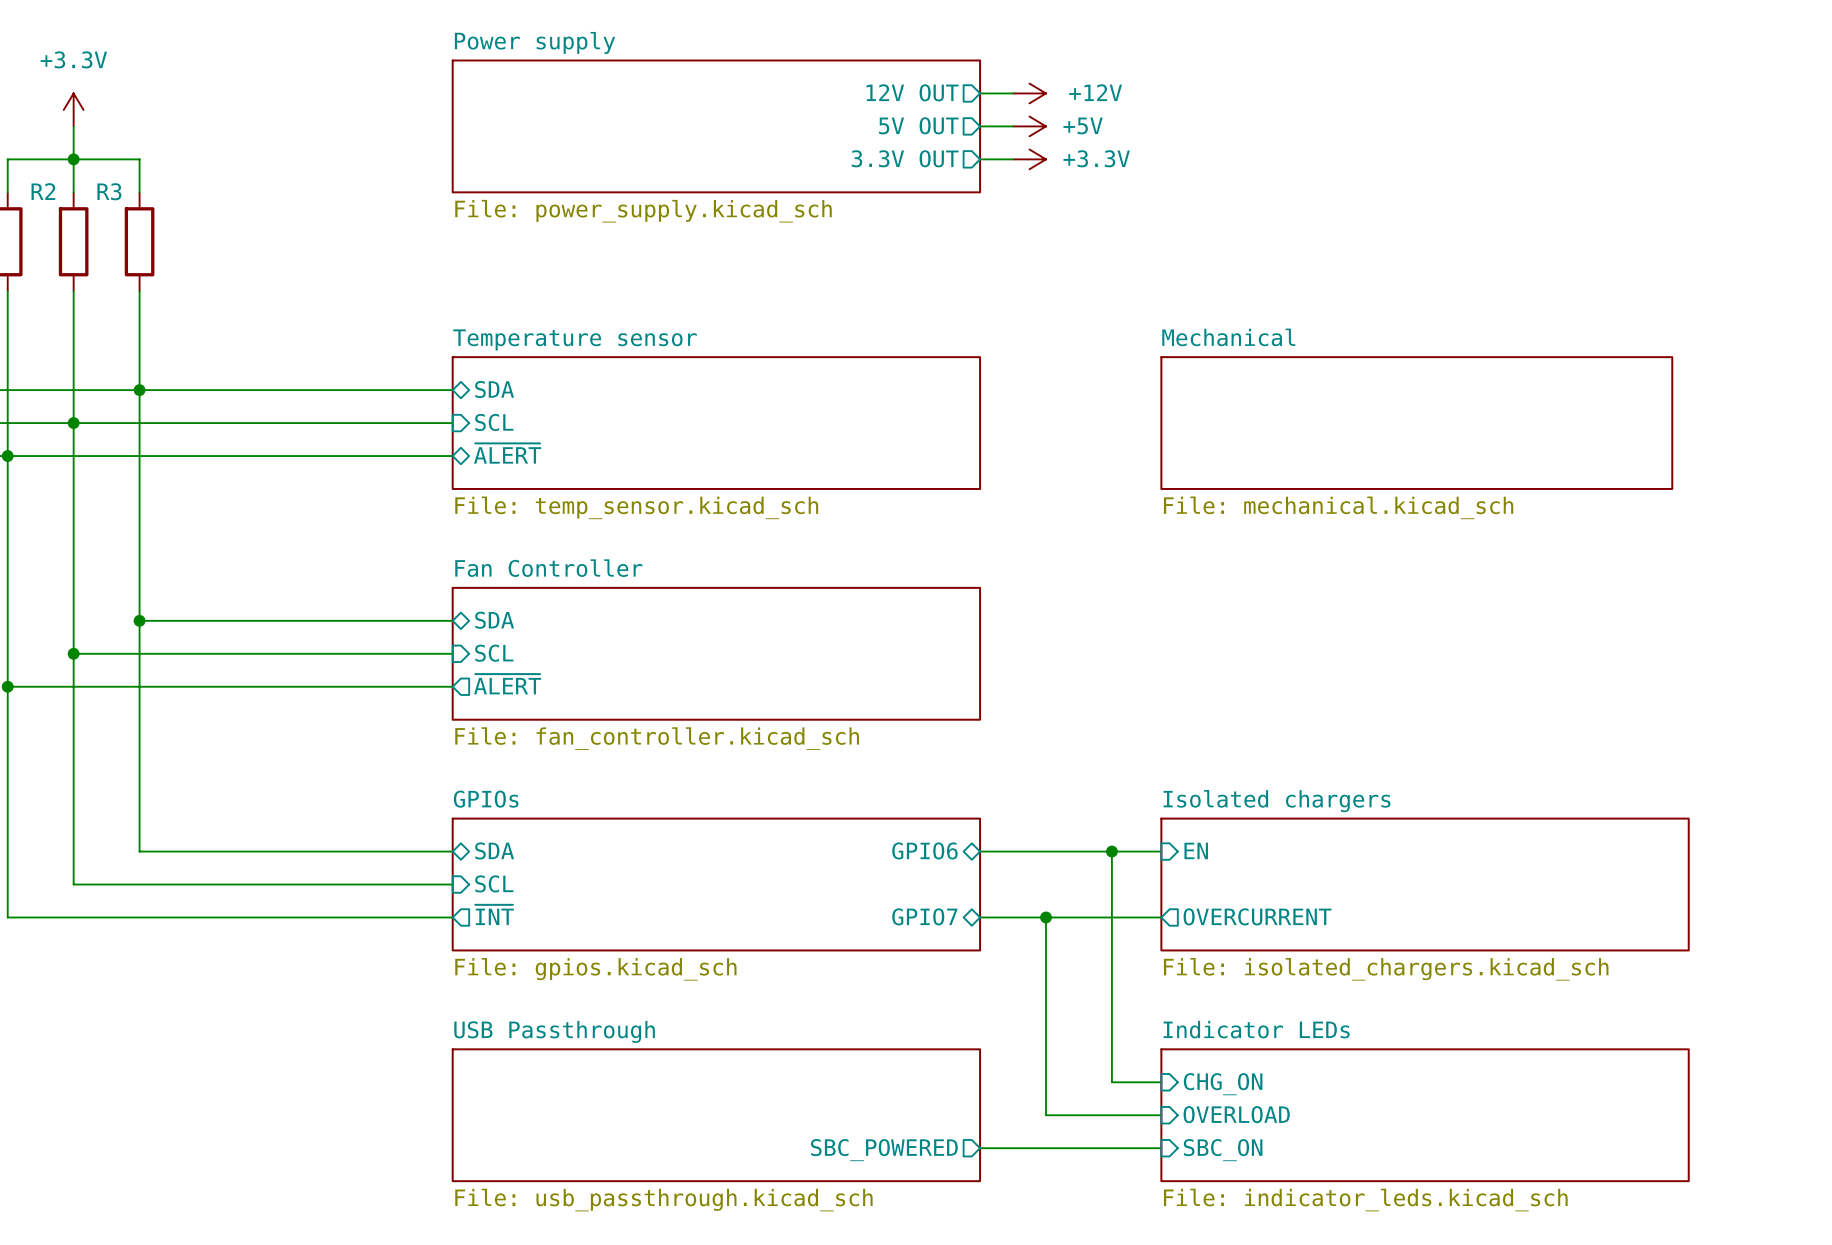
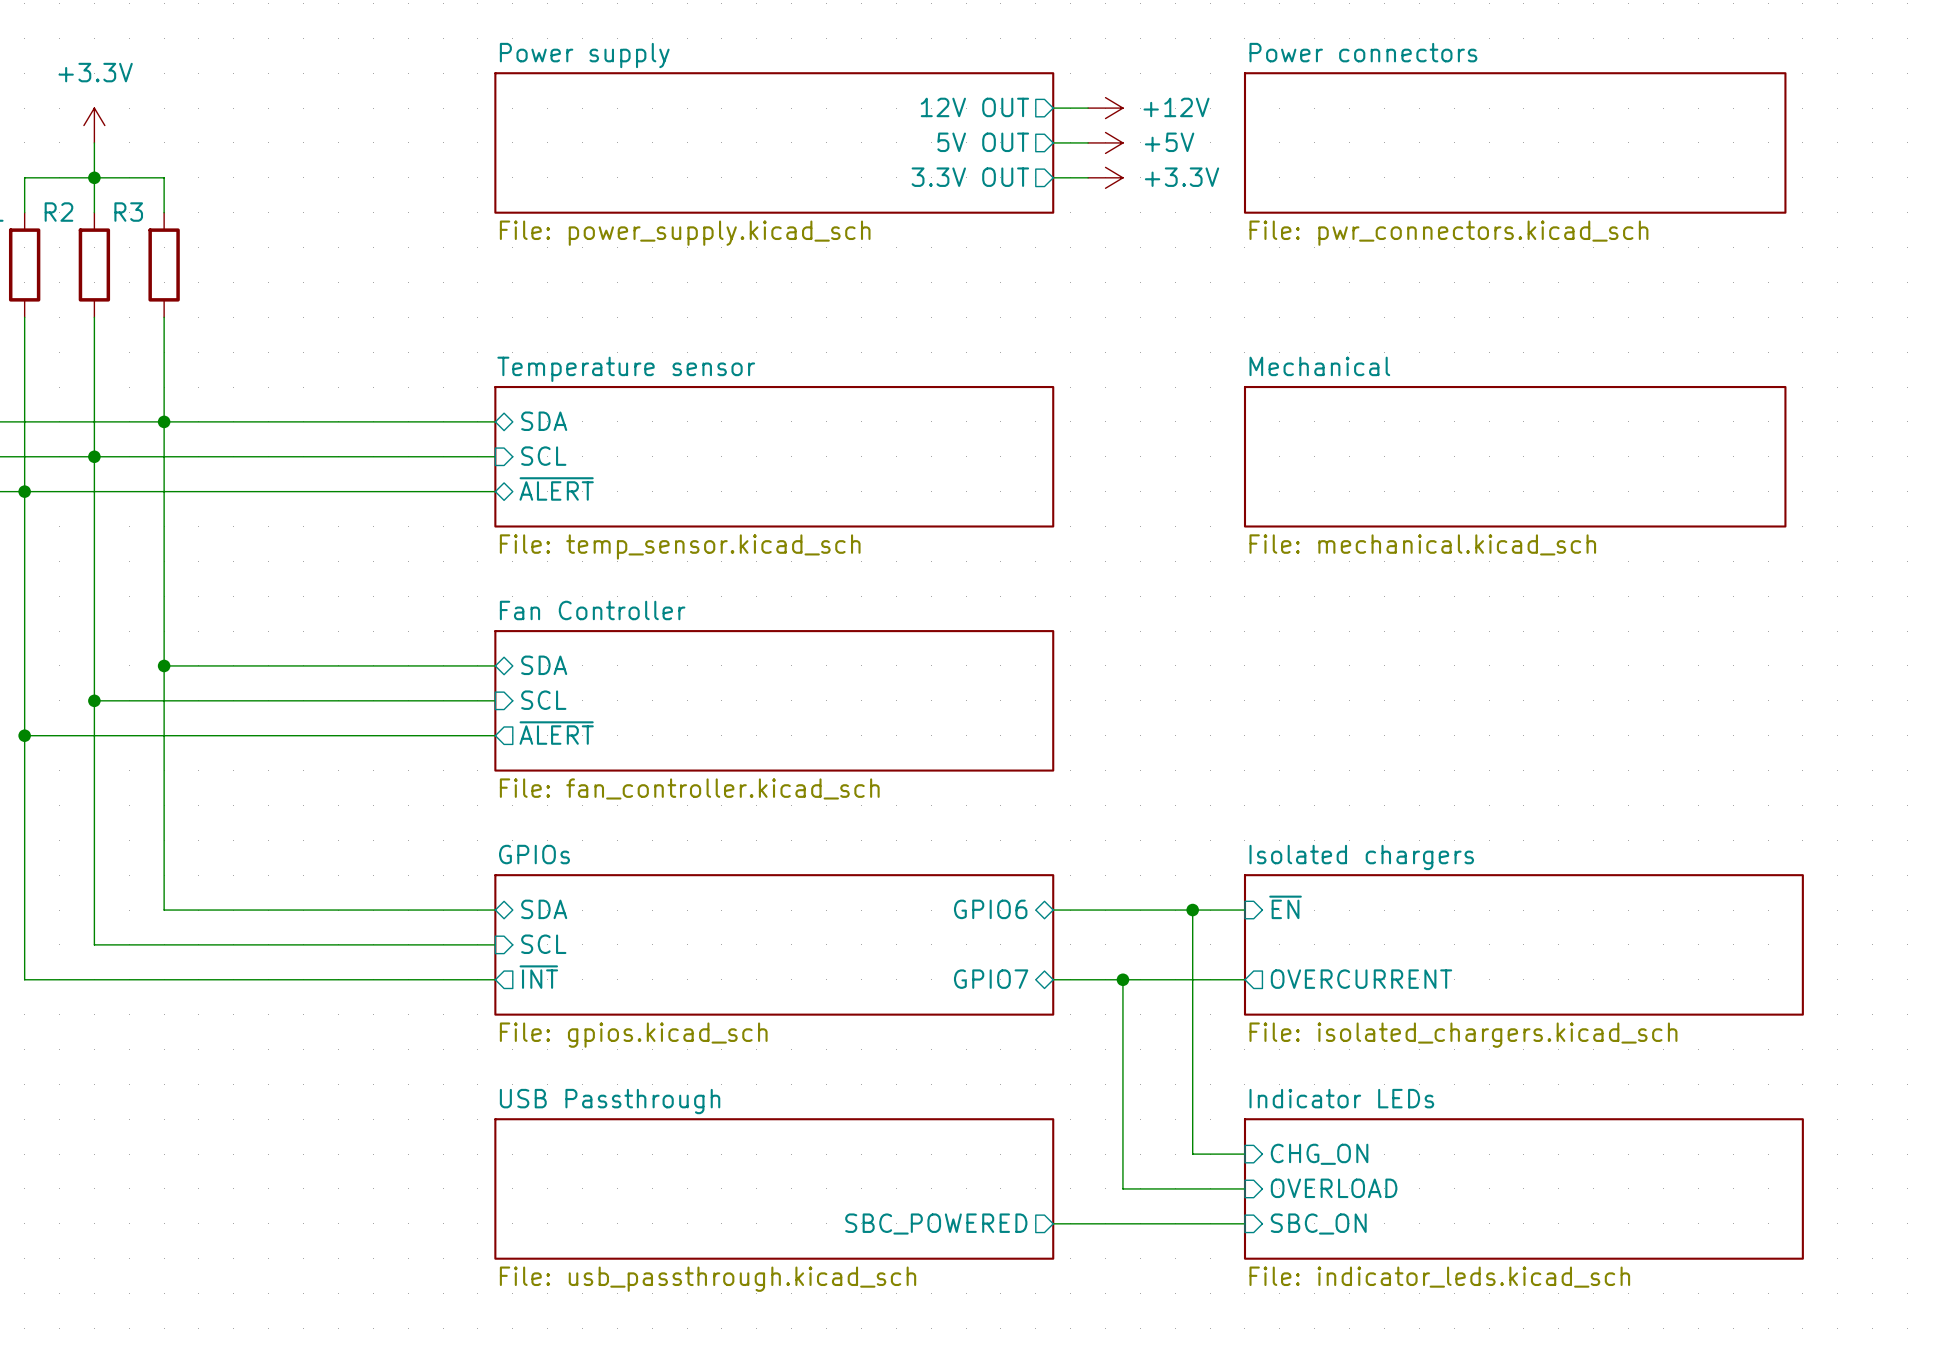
sheet Power connectors: none -> File: pwr_connectors.kicad_sch (1515, 142)
sheet pin: EN (1196, 850) -> ~{EN} (1285, 907)

